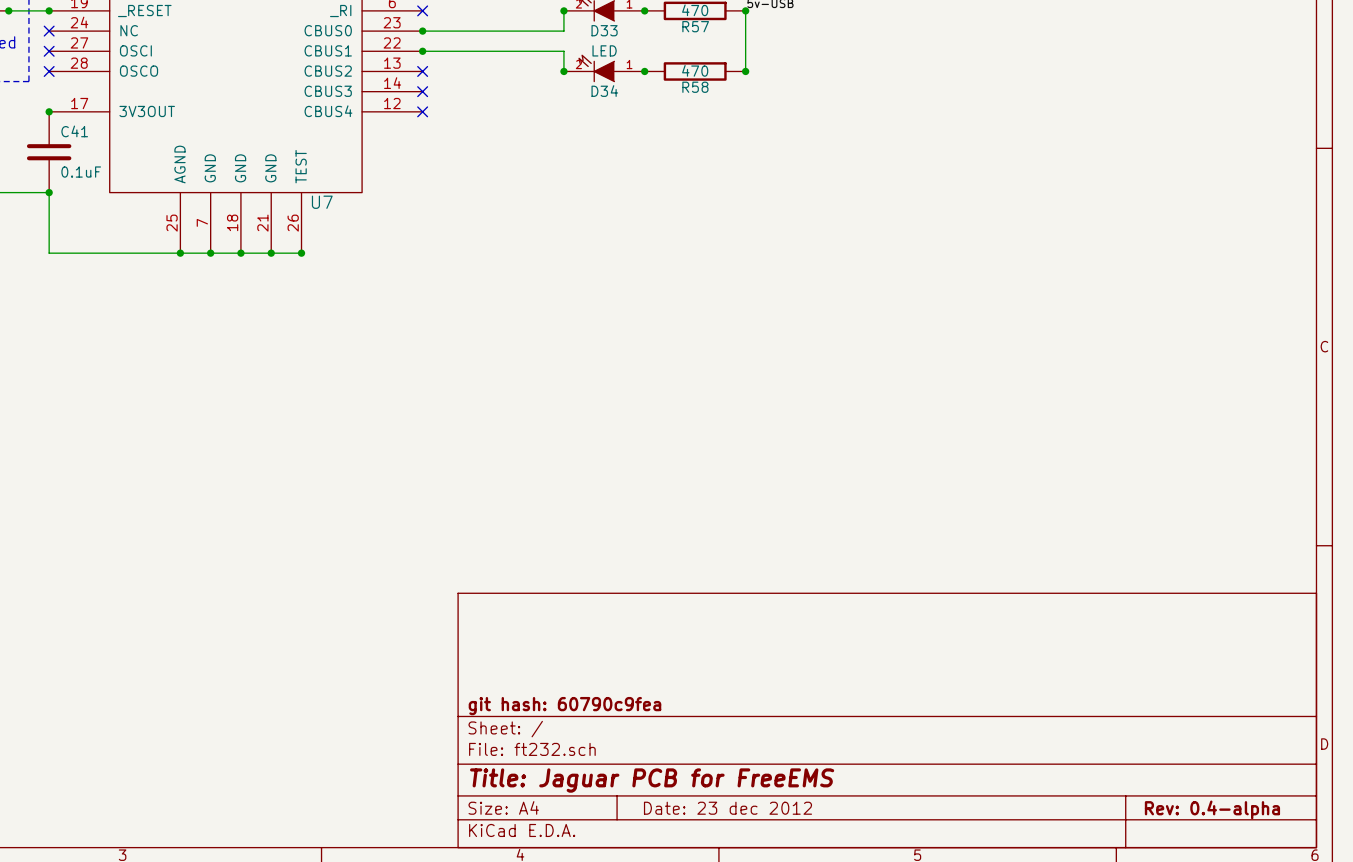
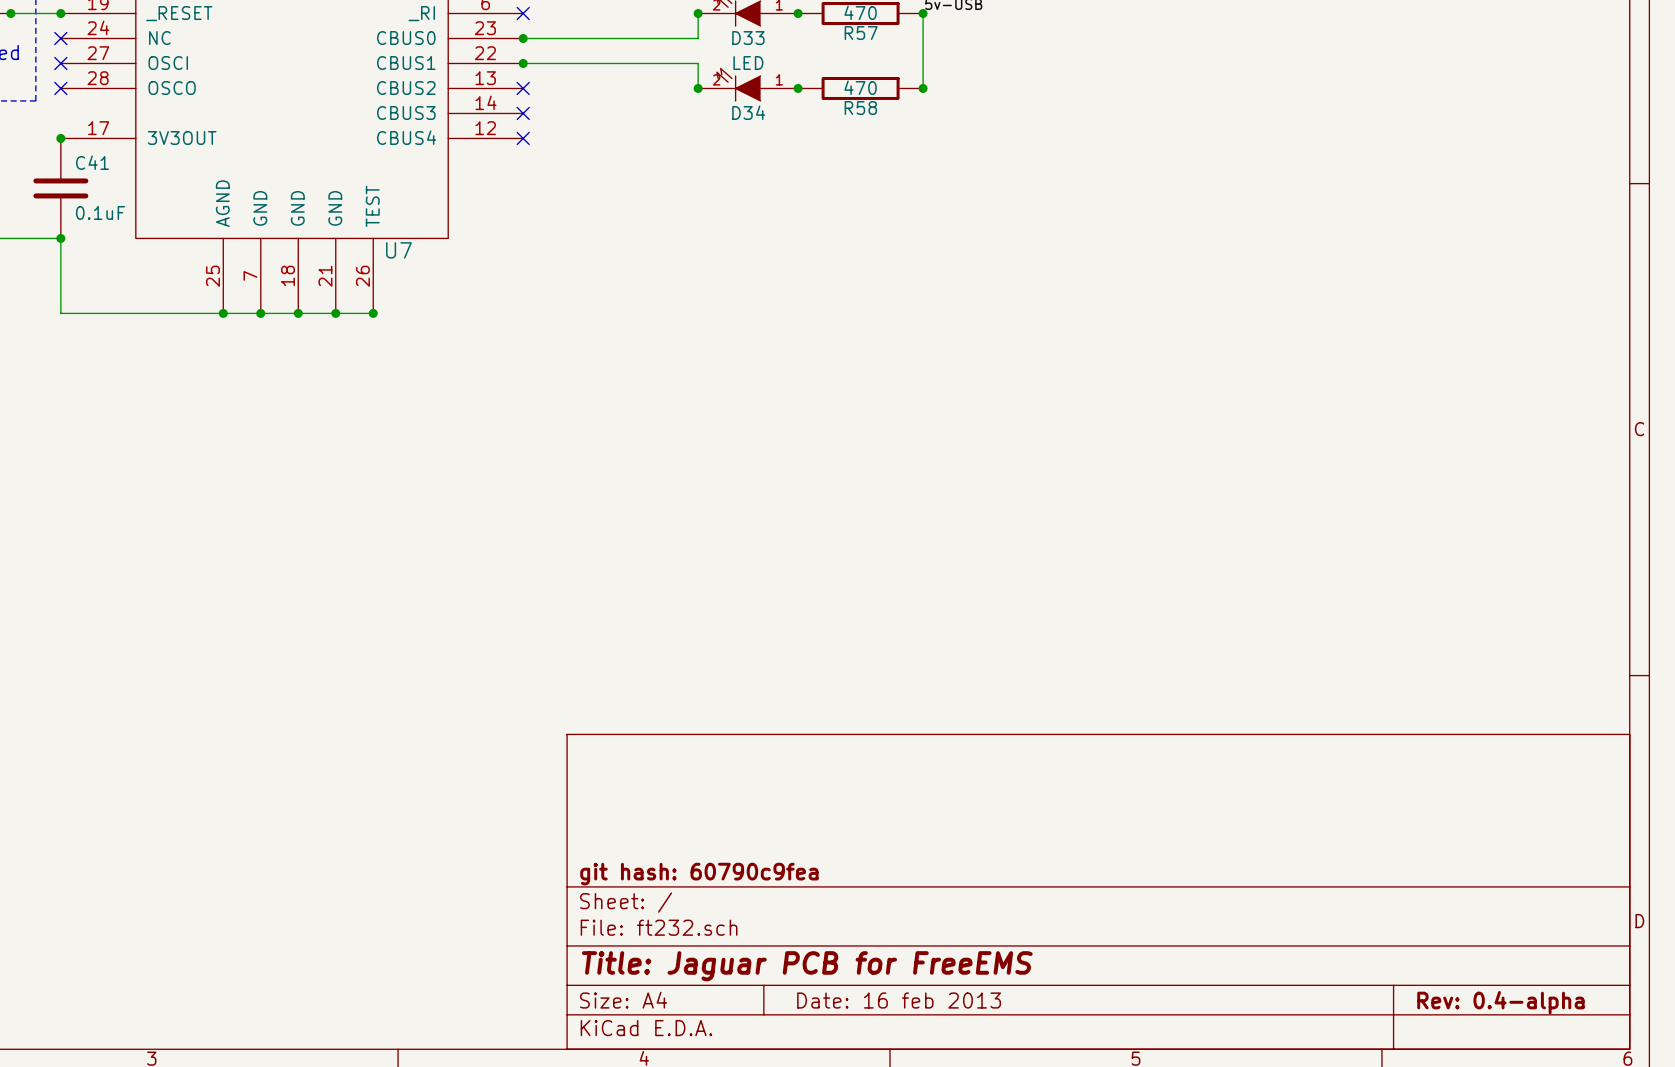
title block: Date: 23 dec 2012 (727, 808) -> Date: 16 feb 2013 (899, 1000)

